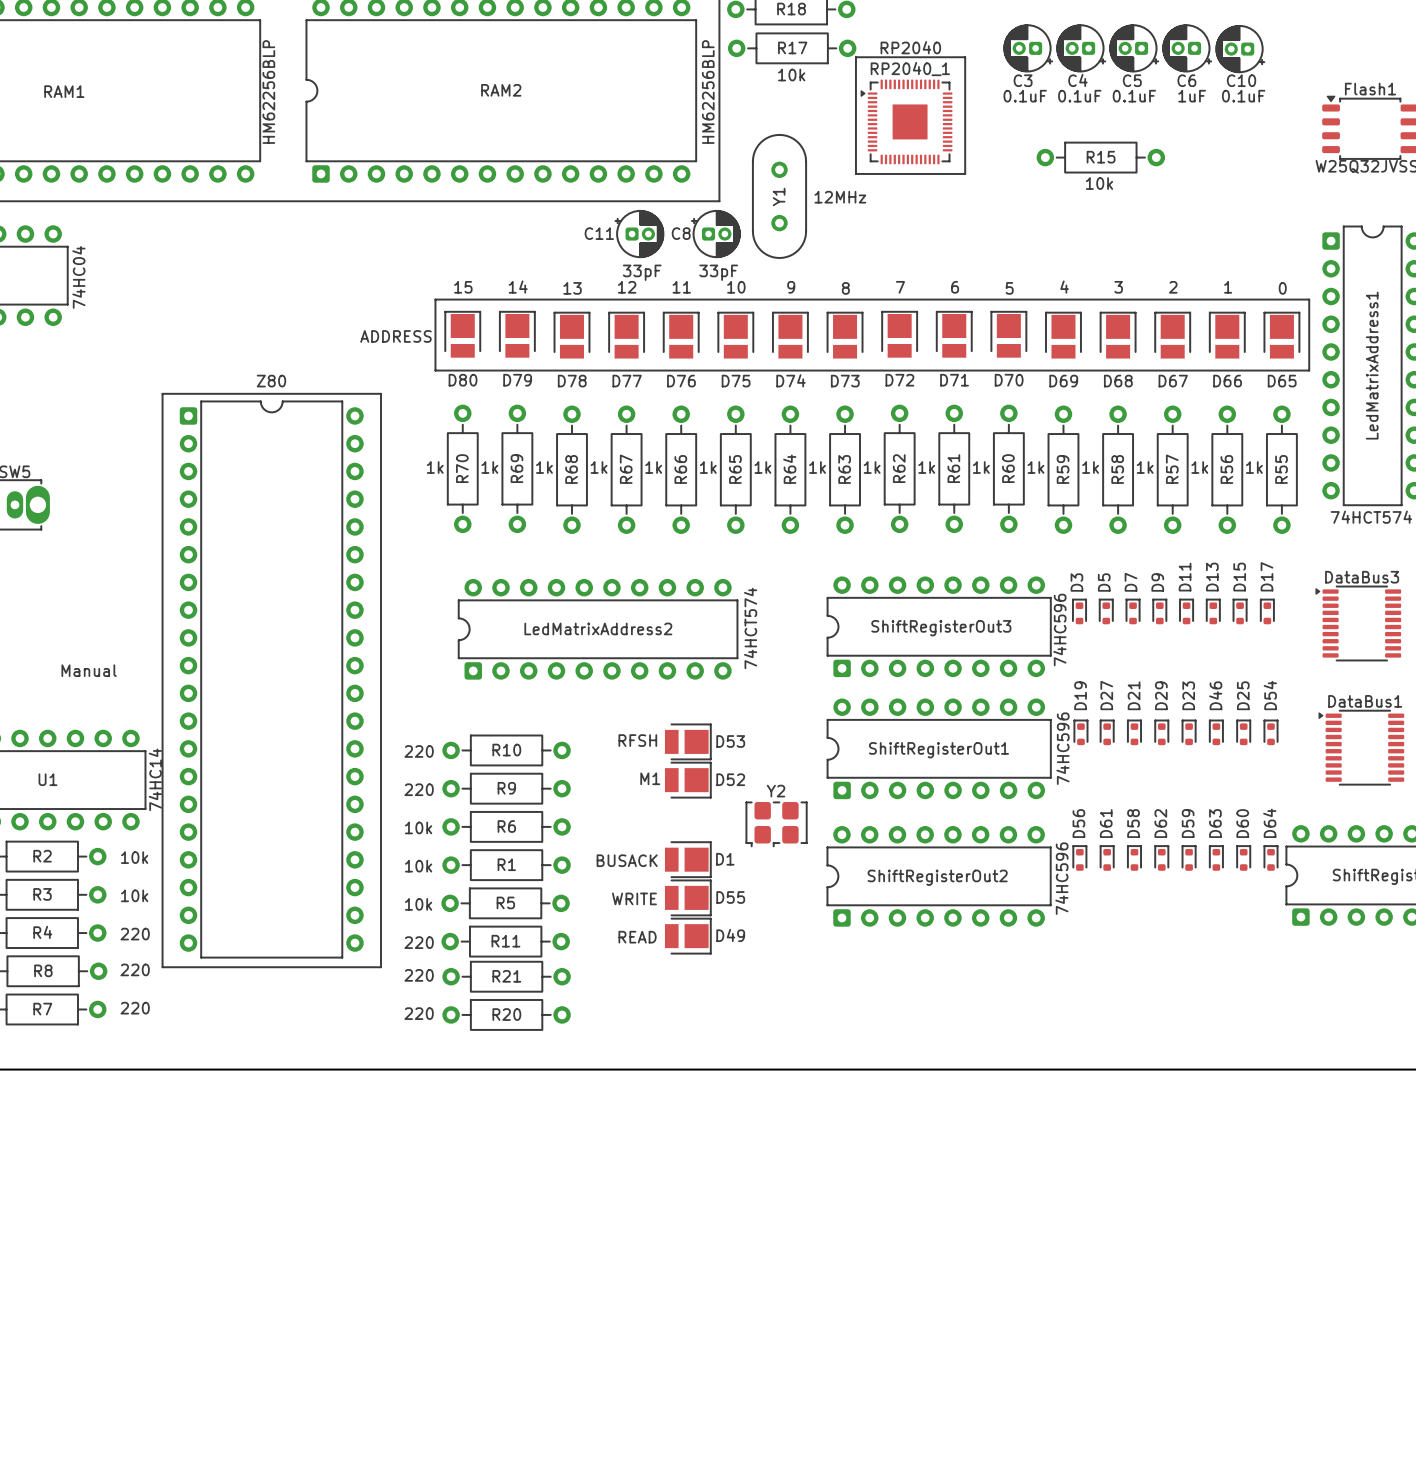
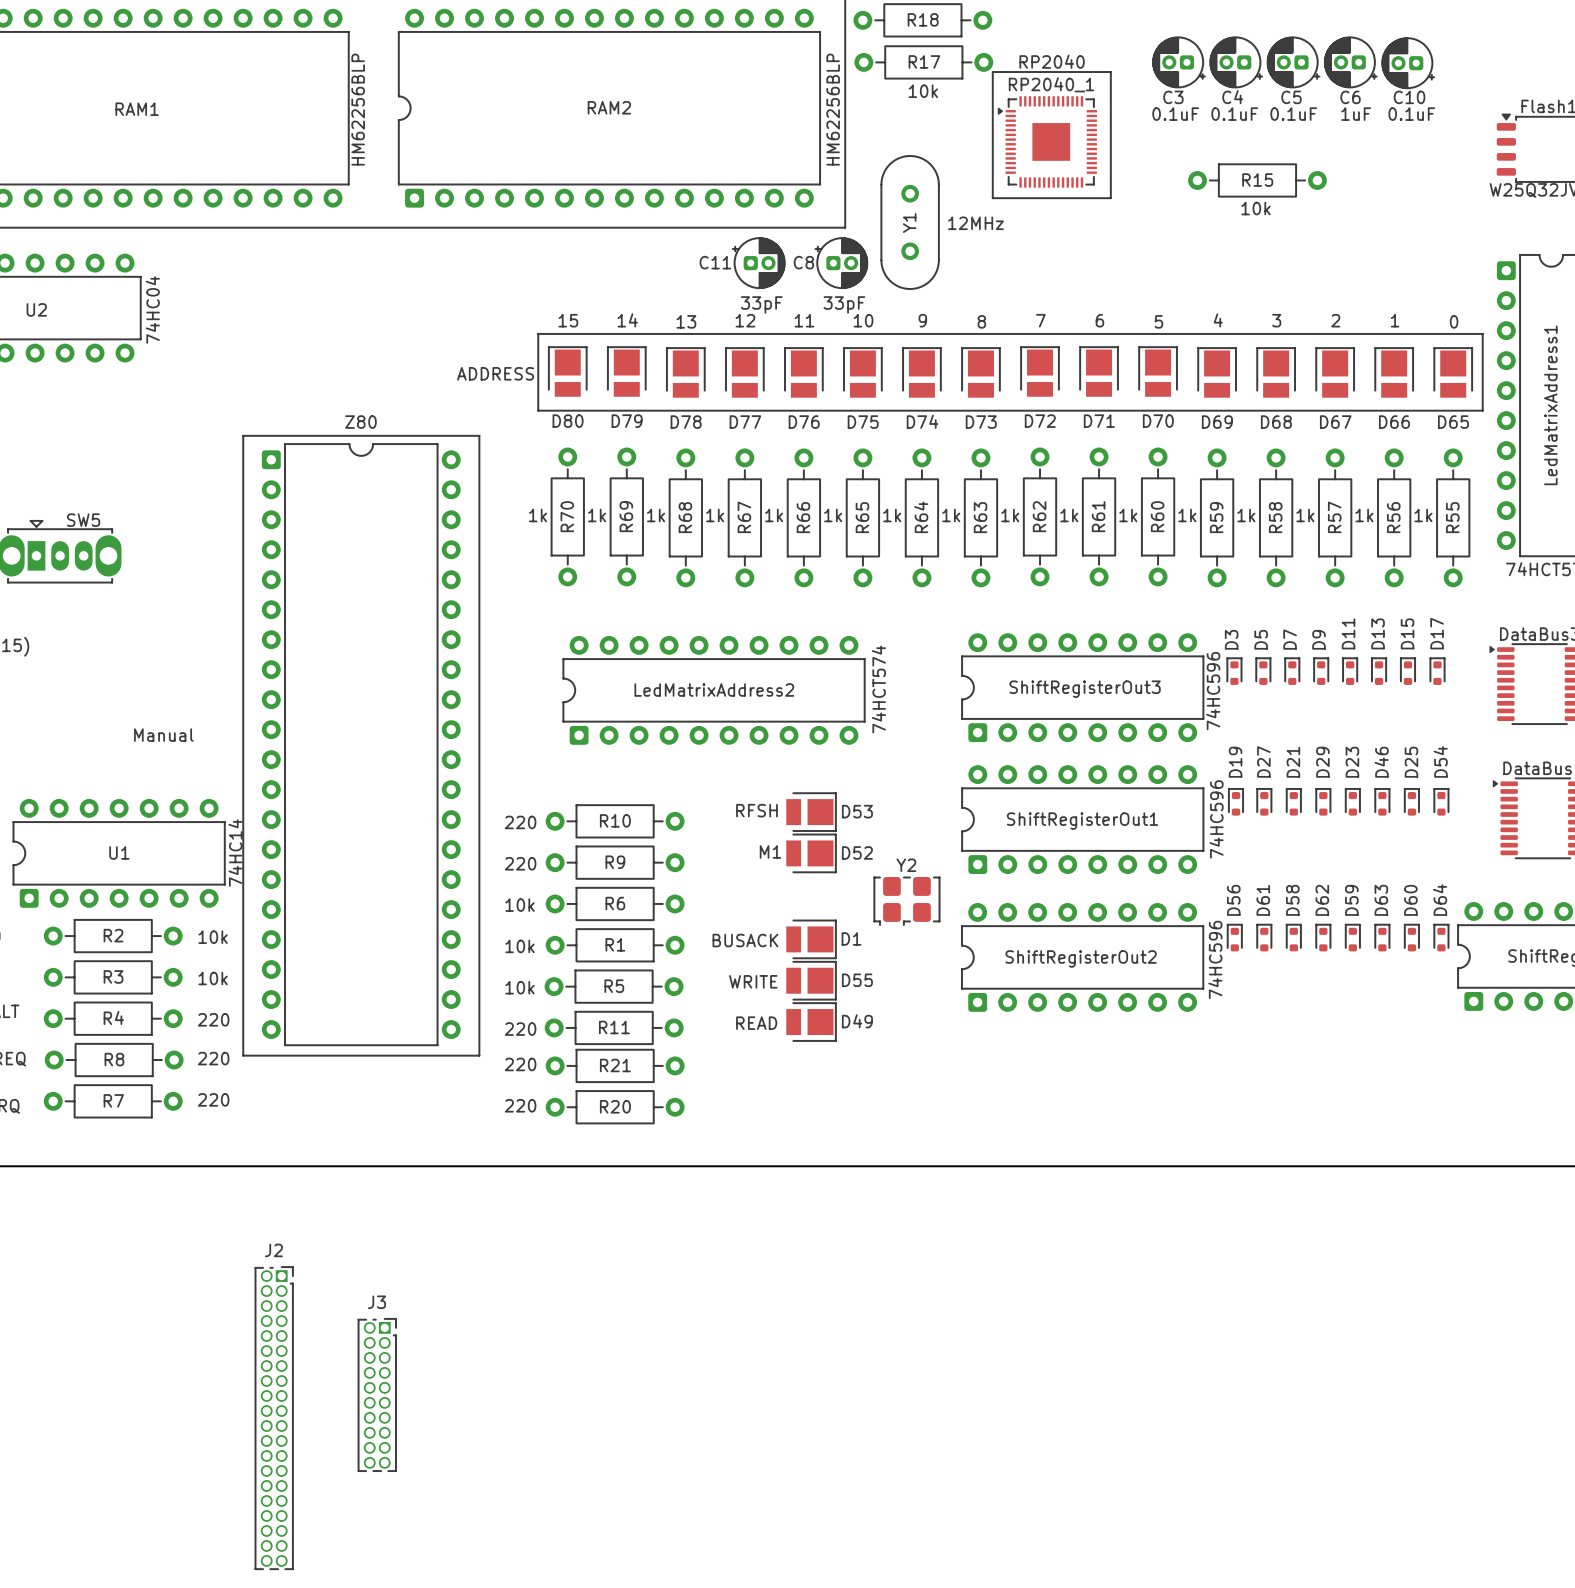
J3: none -> (377, 1394)
J2: none -> (274, 1418)

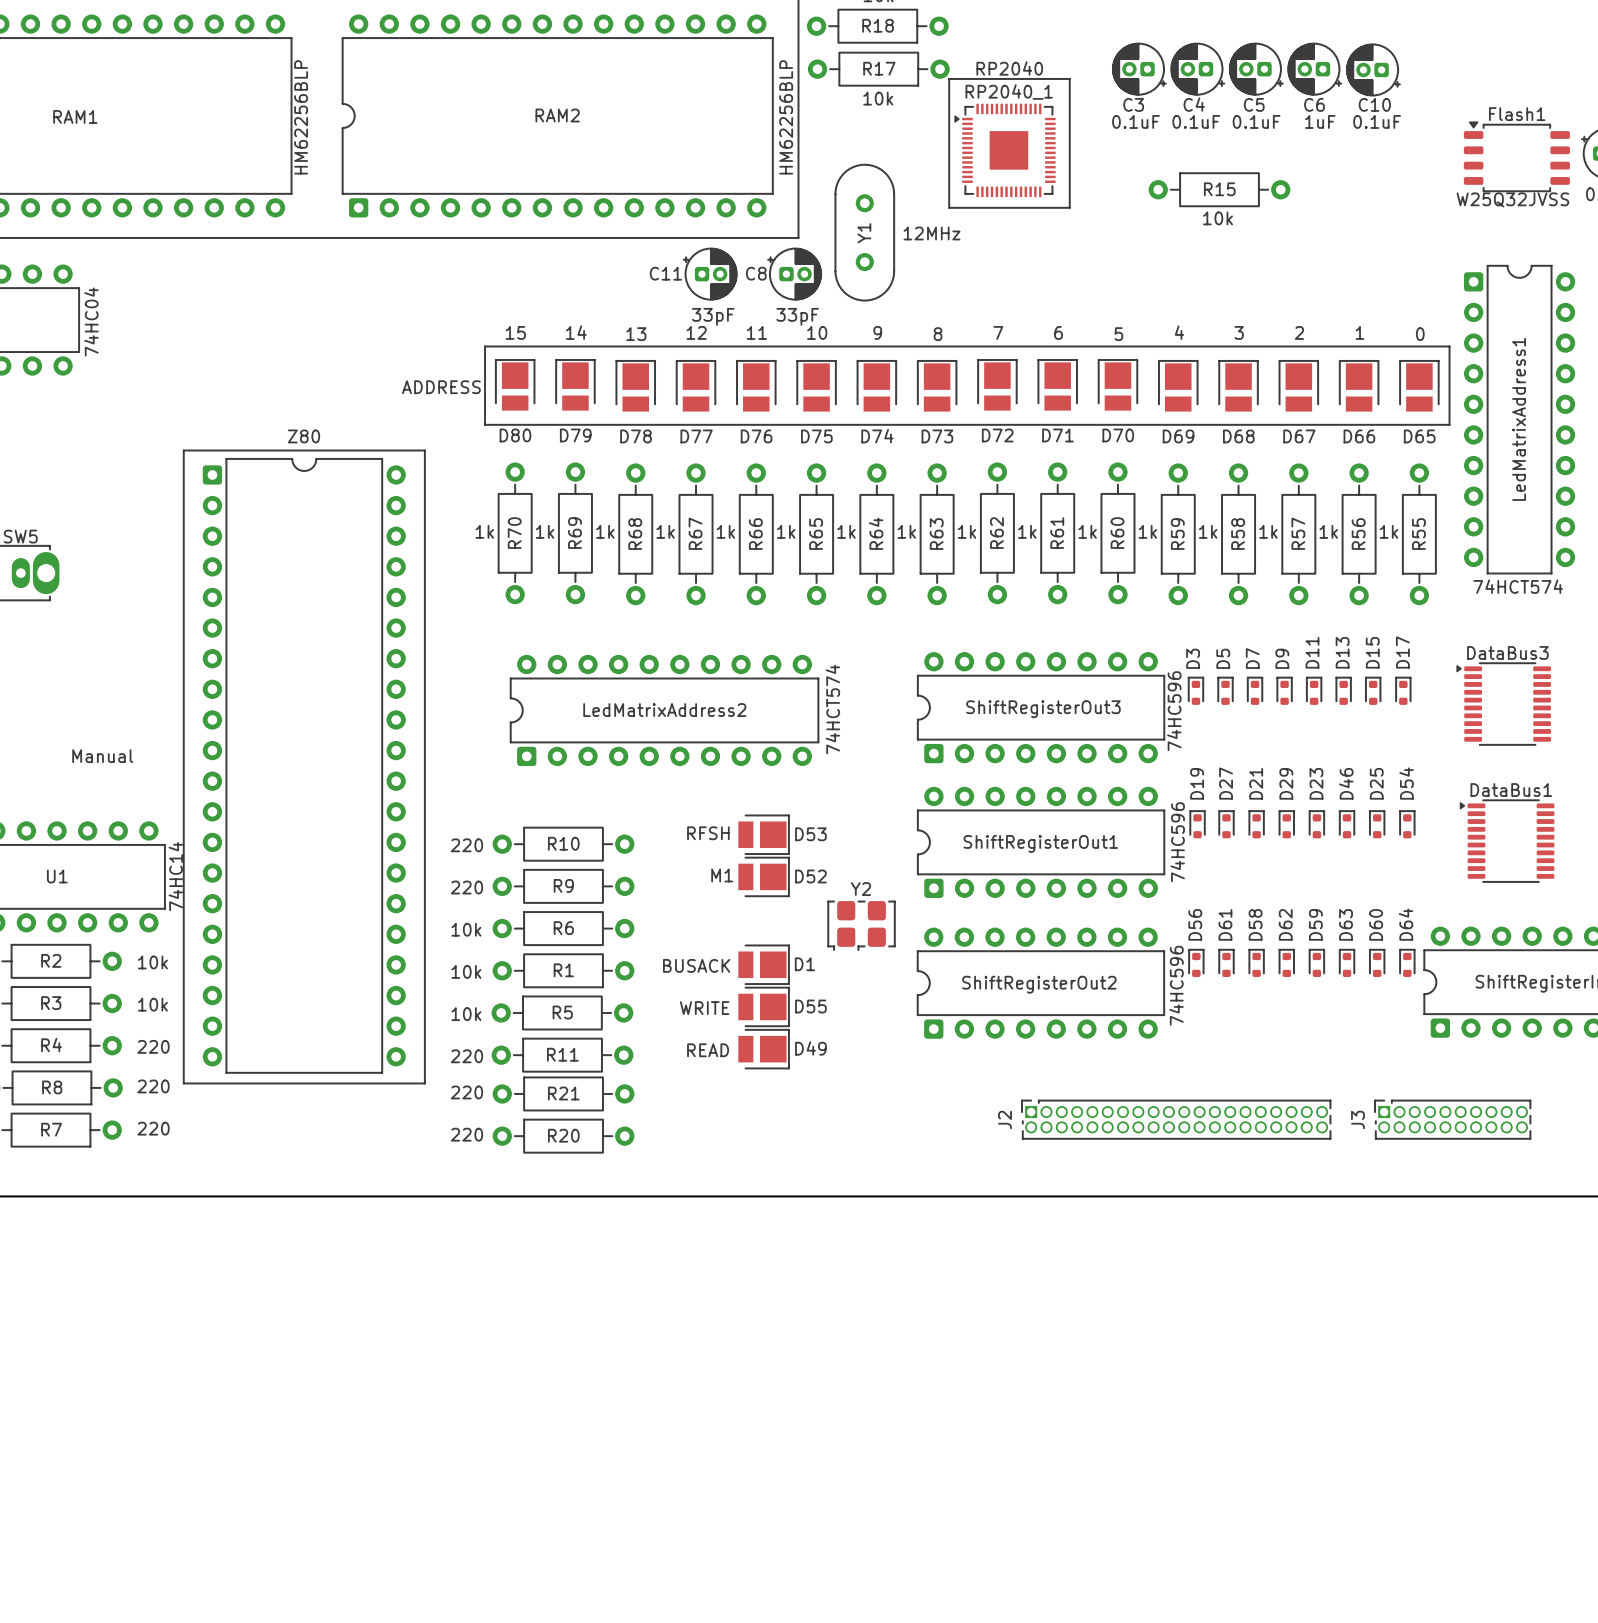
J3 rotation: 0° (377, 1394) -> 90° counterclockwise (1452, 1119)
J3 position: (377, 1394) -> (1452, 1119)
J2 rotation: 0° (274, 1418) -> 90° counterclockwise (1176, 1119)
J2 position: (274, 1418) -> (1176, 1119)

